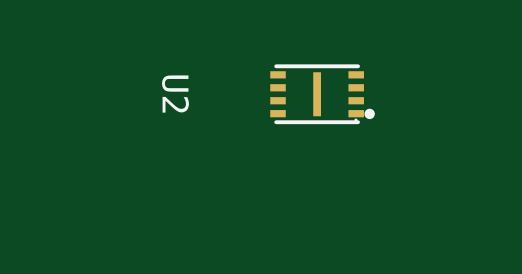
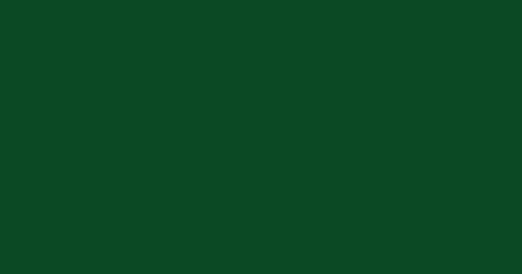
U2: (322, 94) -> none

